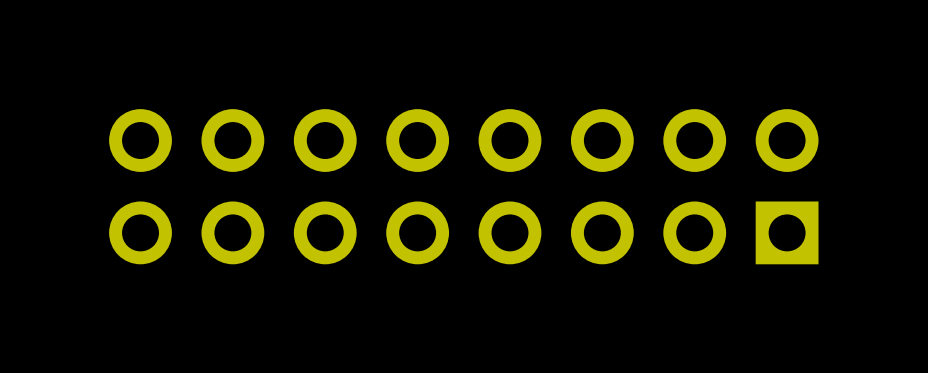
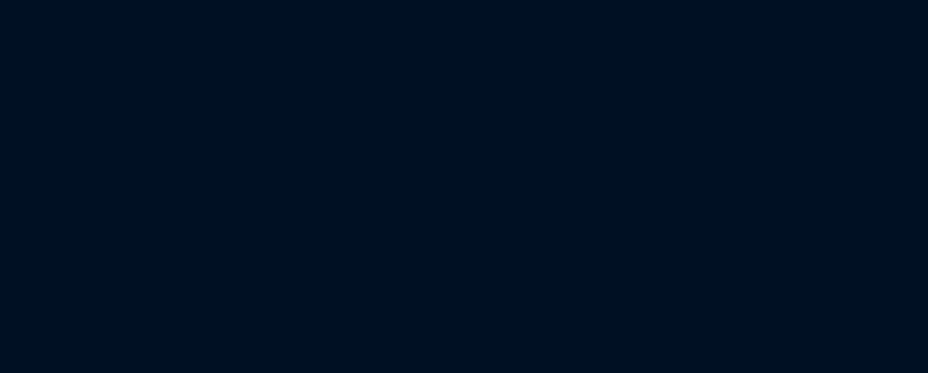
part: (463, 186) -> none

